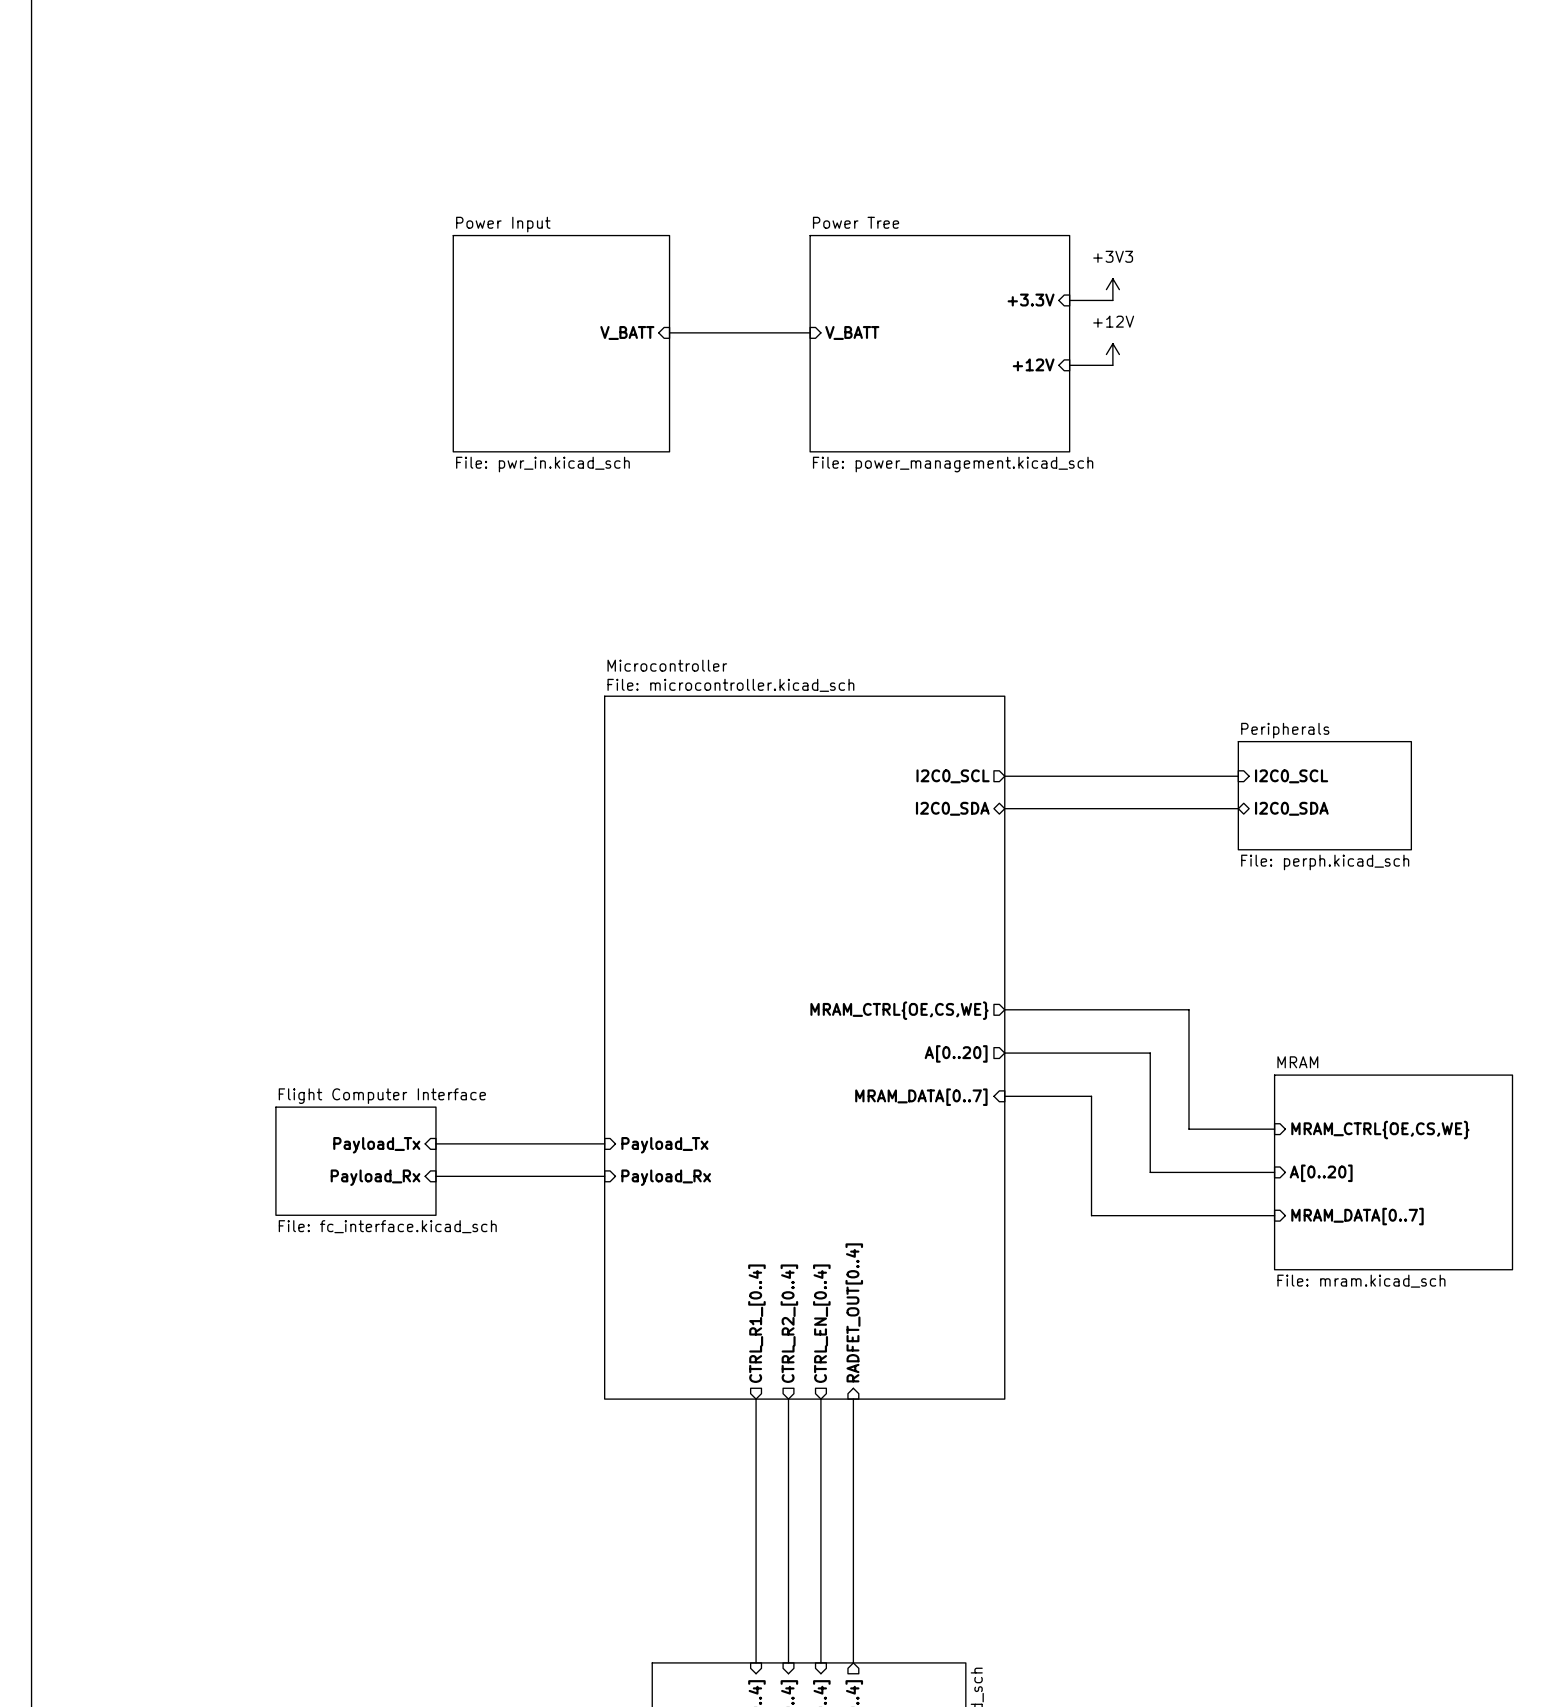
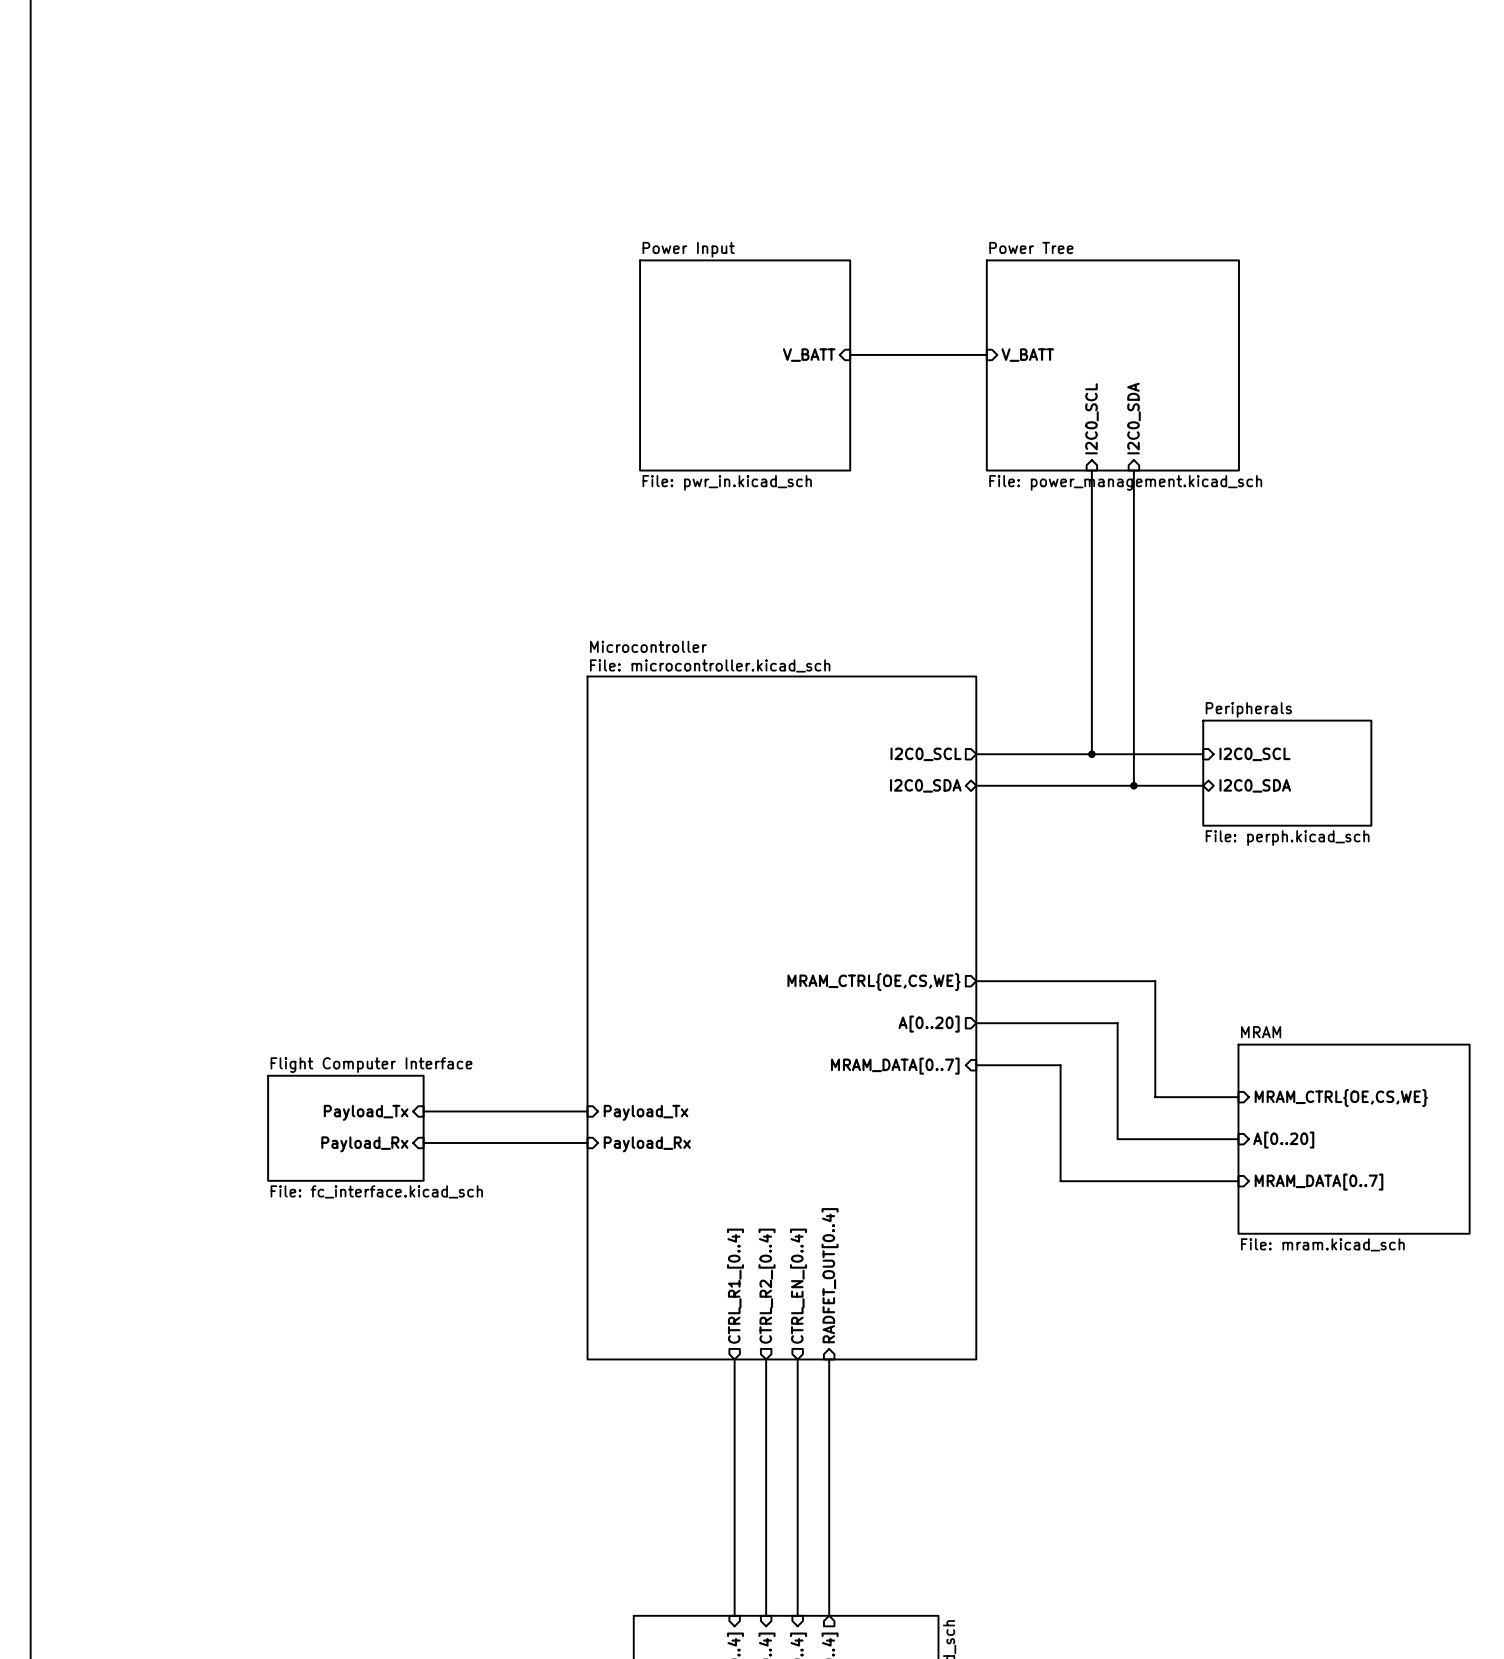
power symbol: +3V3 (1112, 289) -> none
sheet pin: +3.3V (1031, 300) -> none
wire: (1069, 300) (1112, 300) -> none
sheet pin: V_BATT (627, 332) -> none
wire: (669, 332) (810, 332) -> (850, 354) (986, 354)
sheet pin rotation: 0° (852, 332) -> 180° (809, 355)
sheet Power Input position: (561, 343) -> (745, 365)
sheet Power Tree position: (939, 343) -> (1112, 365)
power symbol: +12V (1112, 354) -> none
sheet pin: +12V (1033, 364) -> none
sheet pin: none -> V_BATT (1027, 355)
wire: (1069, 365) (1112, 365) -> none
sheet pin: none -> I2C0_SDA (1134, 418)
sheet pin: none -> I2C0_SCL (1091, 418)
wire: none -> (1091, 470) (1091, 754)
wire: none -> (1133, 470) (1133, 785)
junction: none -> (1091, 754)
junction: none -> (1133, 785)

